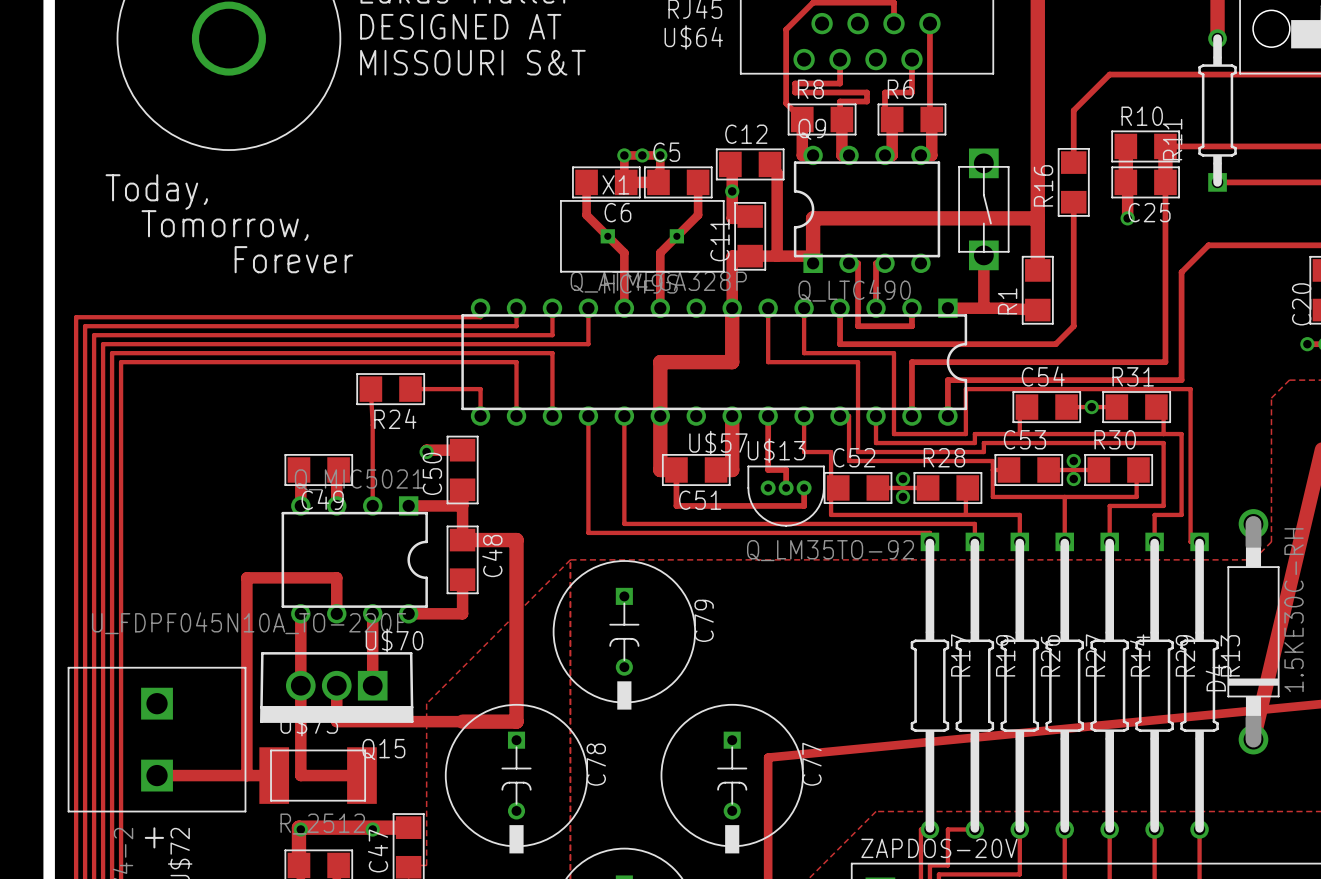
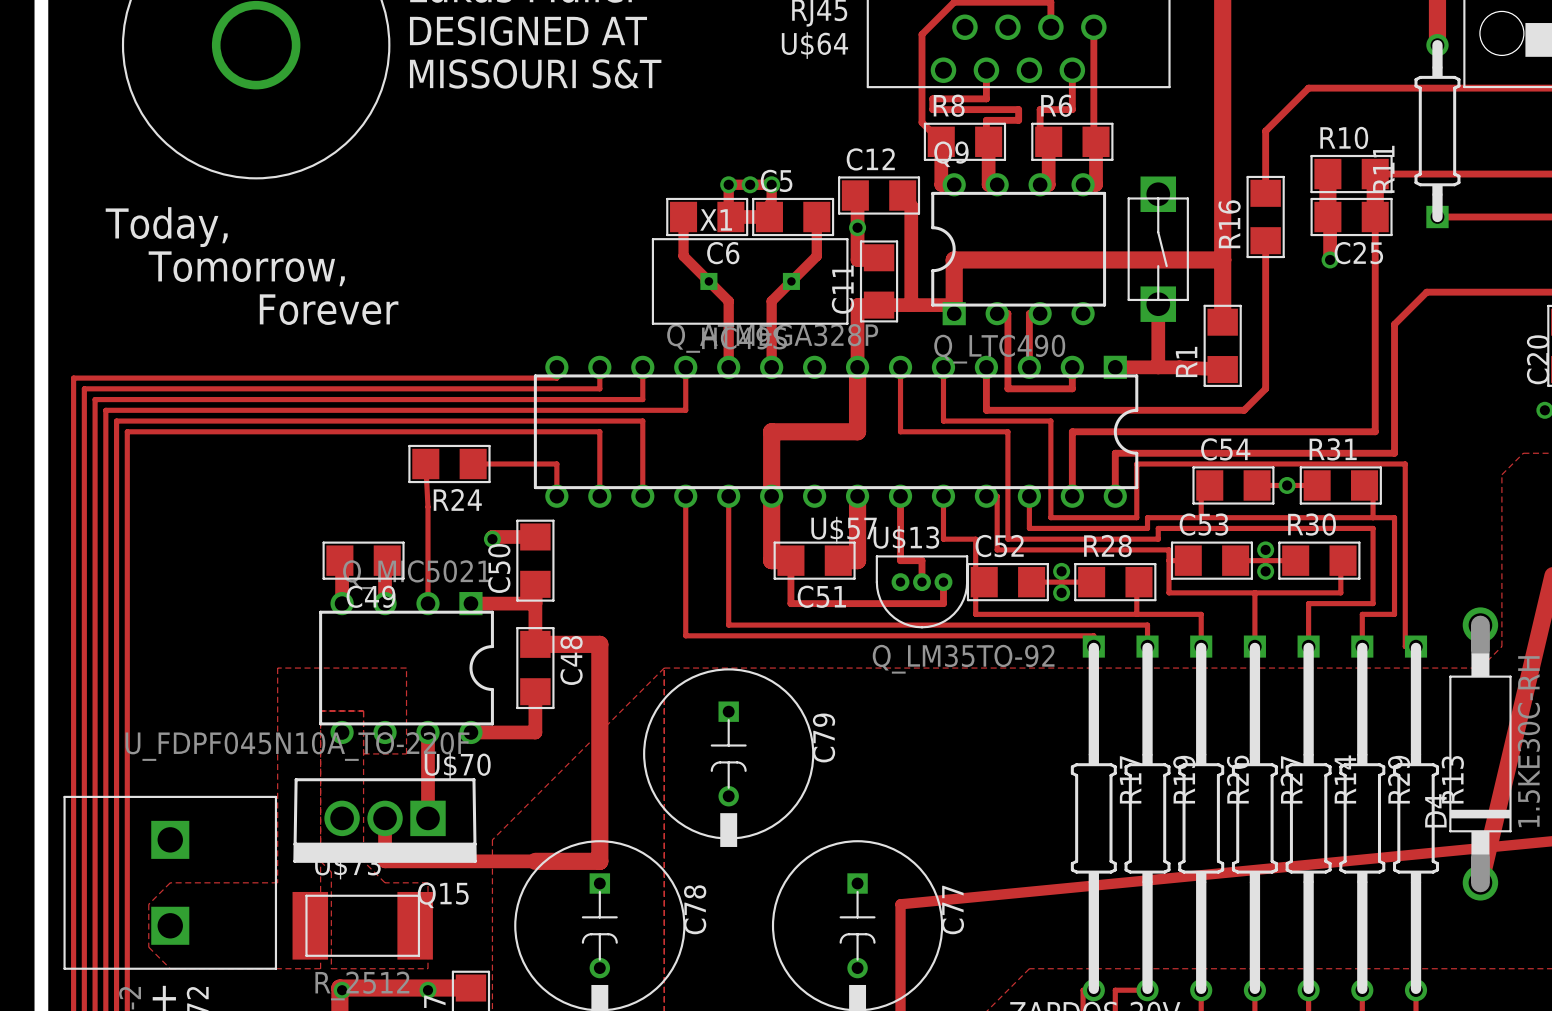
track: (300, 613) (300, 775) (361, 775) -> none
track: (336, 613) (336, 577) (246, 577) (246, 775) -> none
zone outline: none -> (363, 753) (406, 753) (406, 668) (277, 668) (277, 882) (170, 882) (148, 904) (148, 947) (170, 968) (320, 968) (320, 711) (363, 711) (363, 861) (385, 882) (428, 882) (428, 968) (331, 968) (331, 872) (320, 861)
track: (157, 775) (274, 775) -> none

